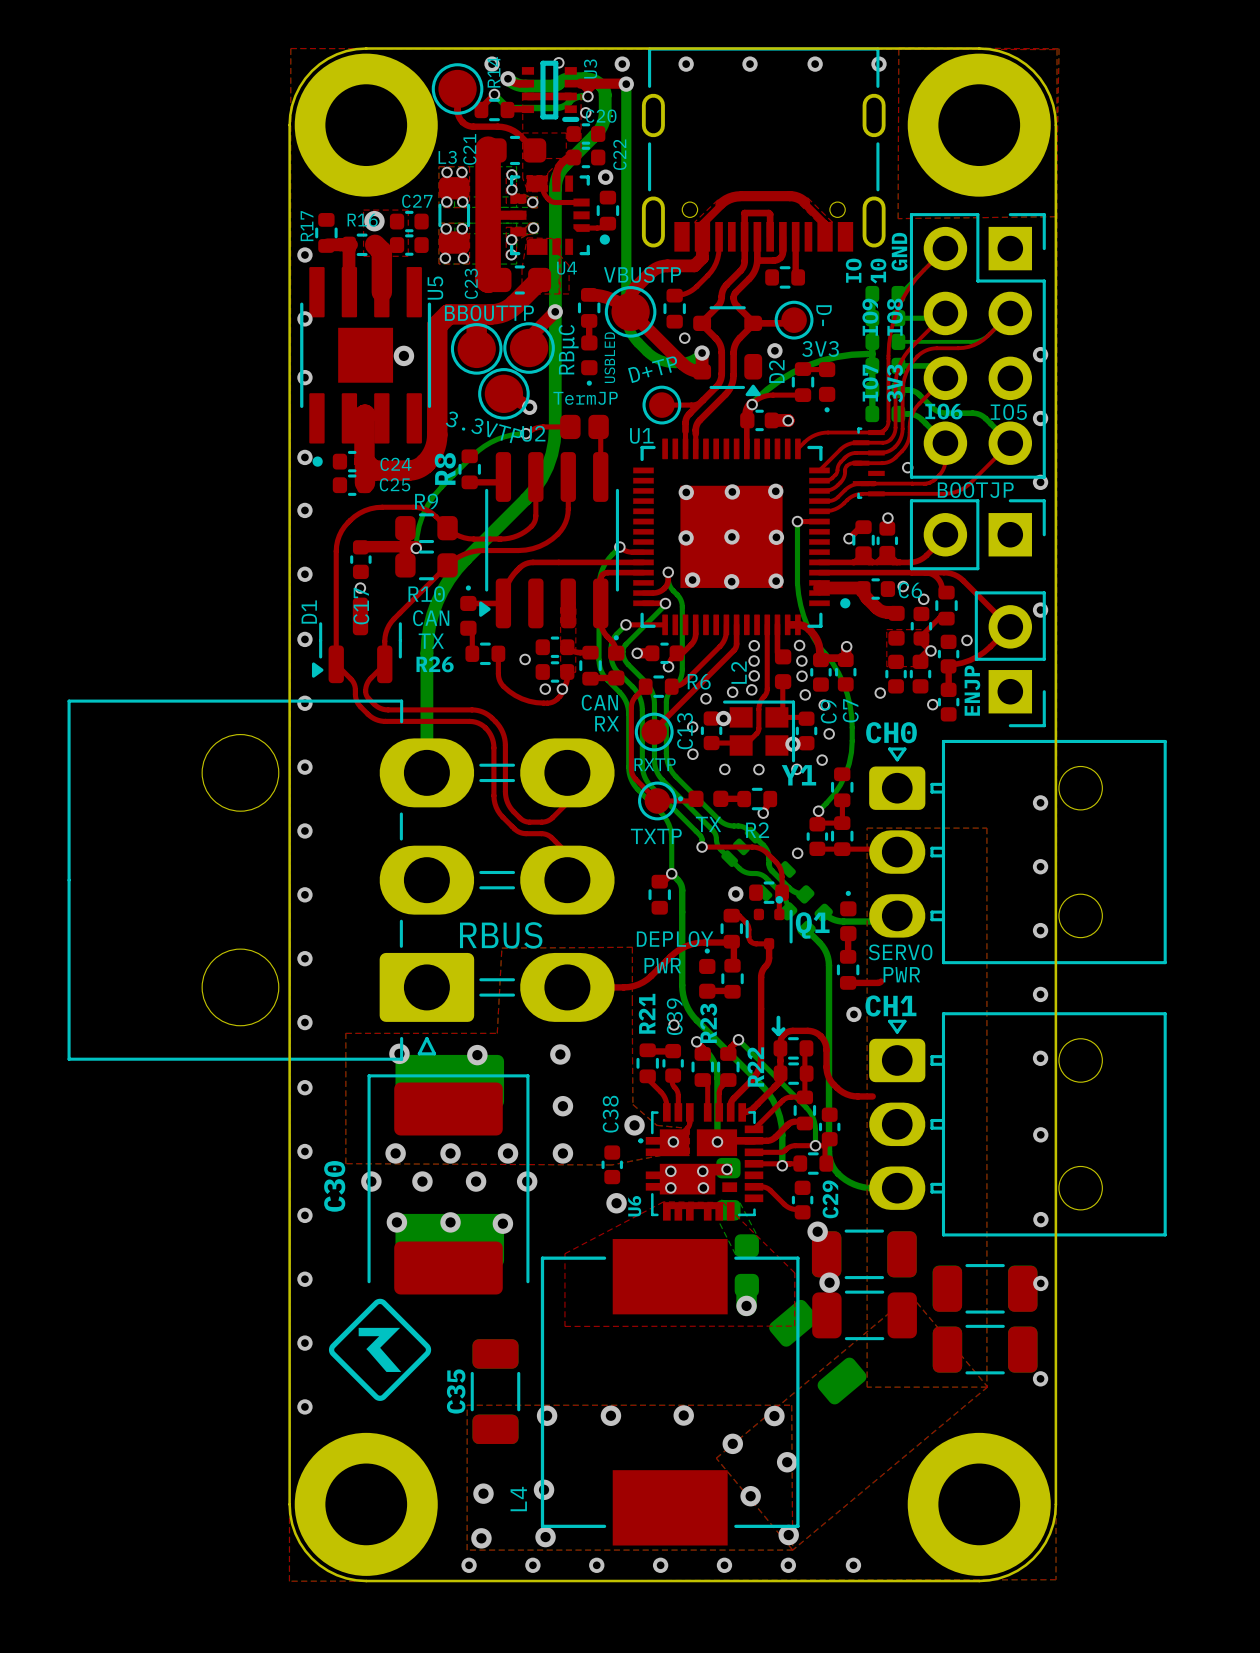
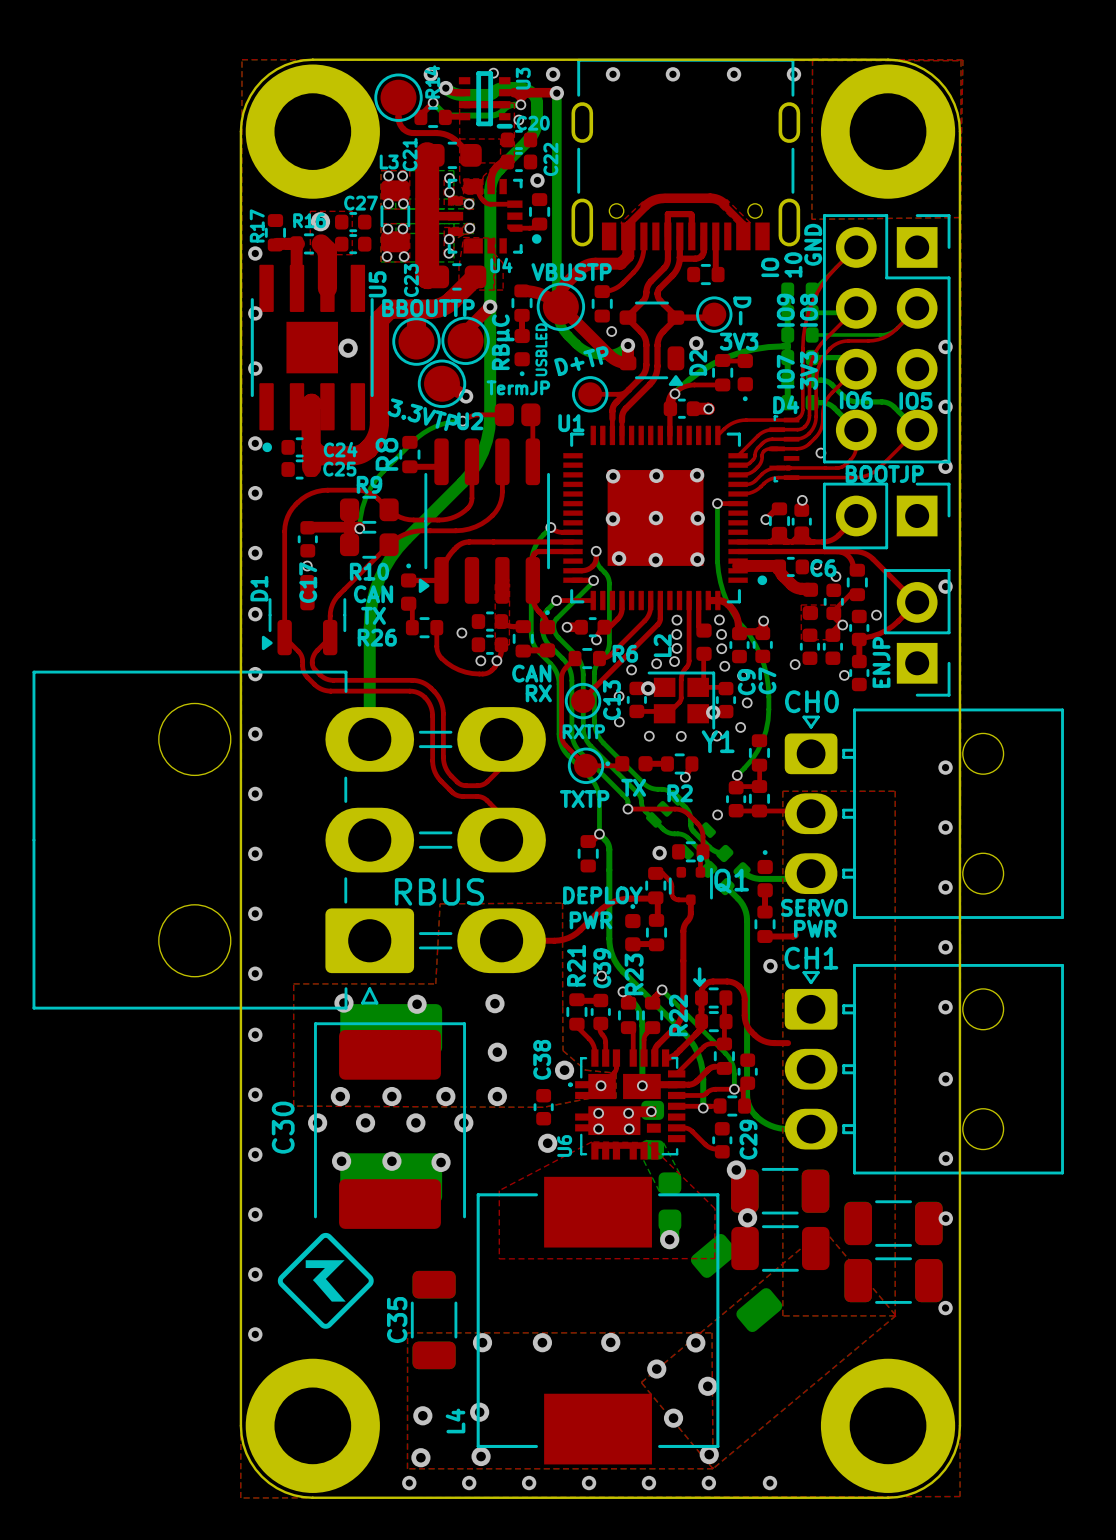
D4 name: none -> D4 (786, 404)

